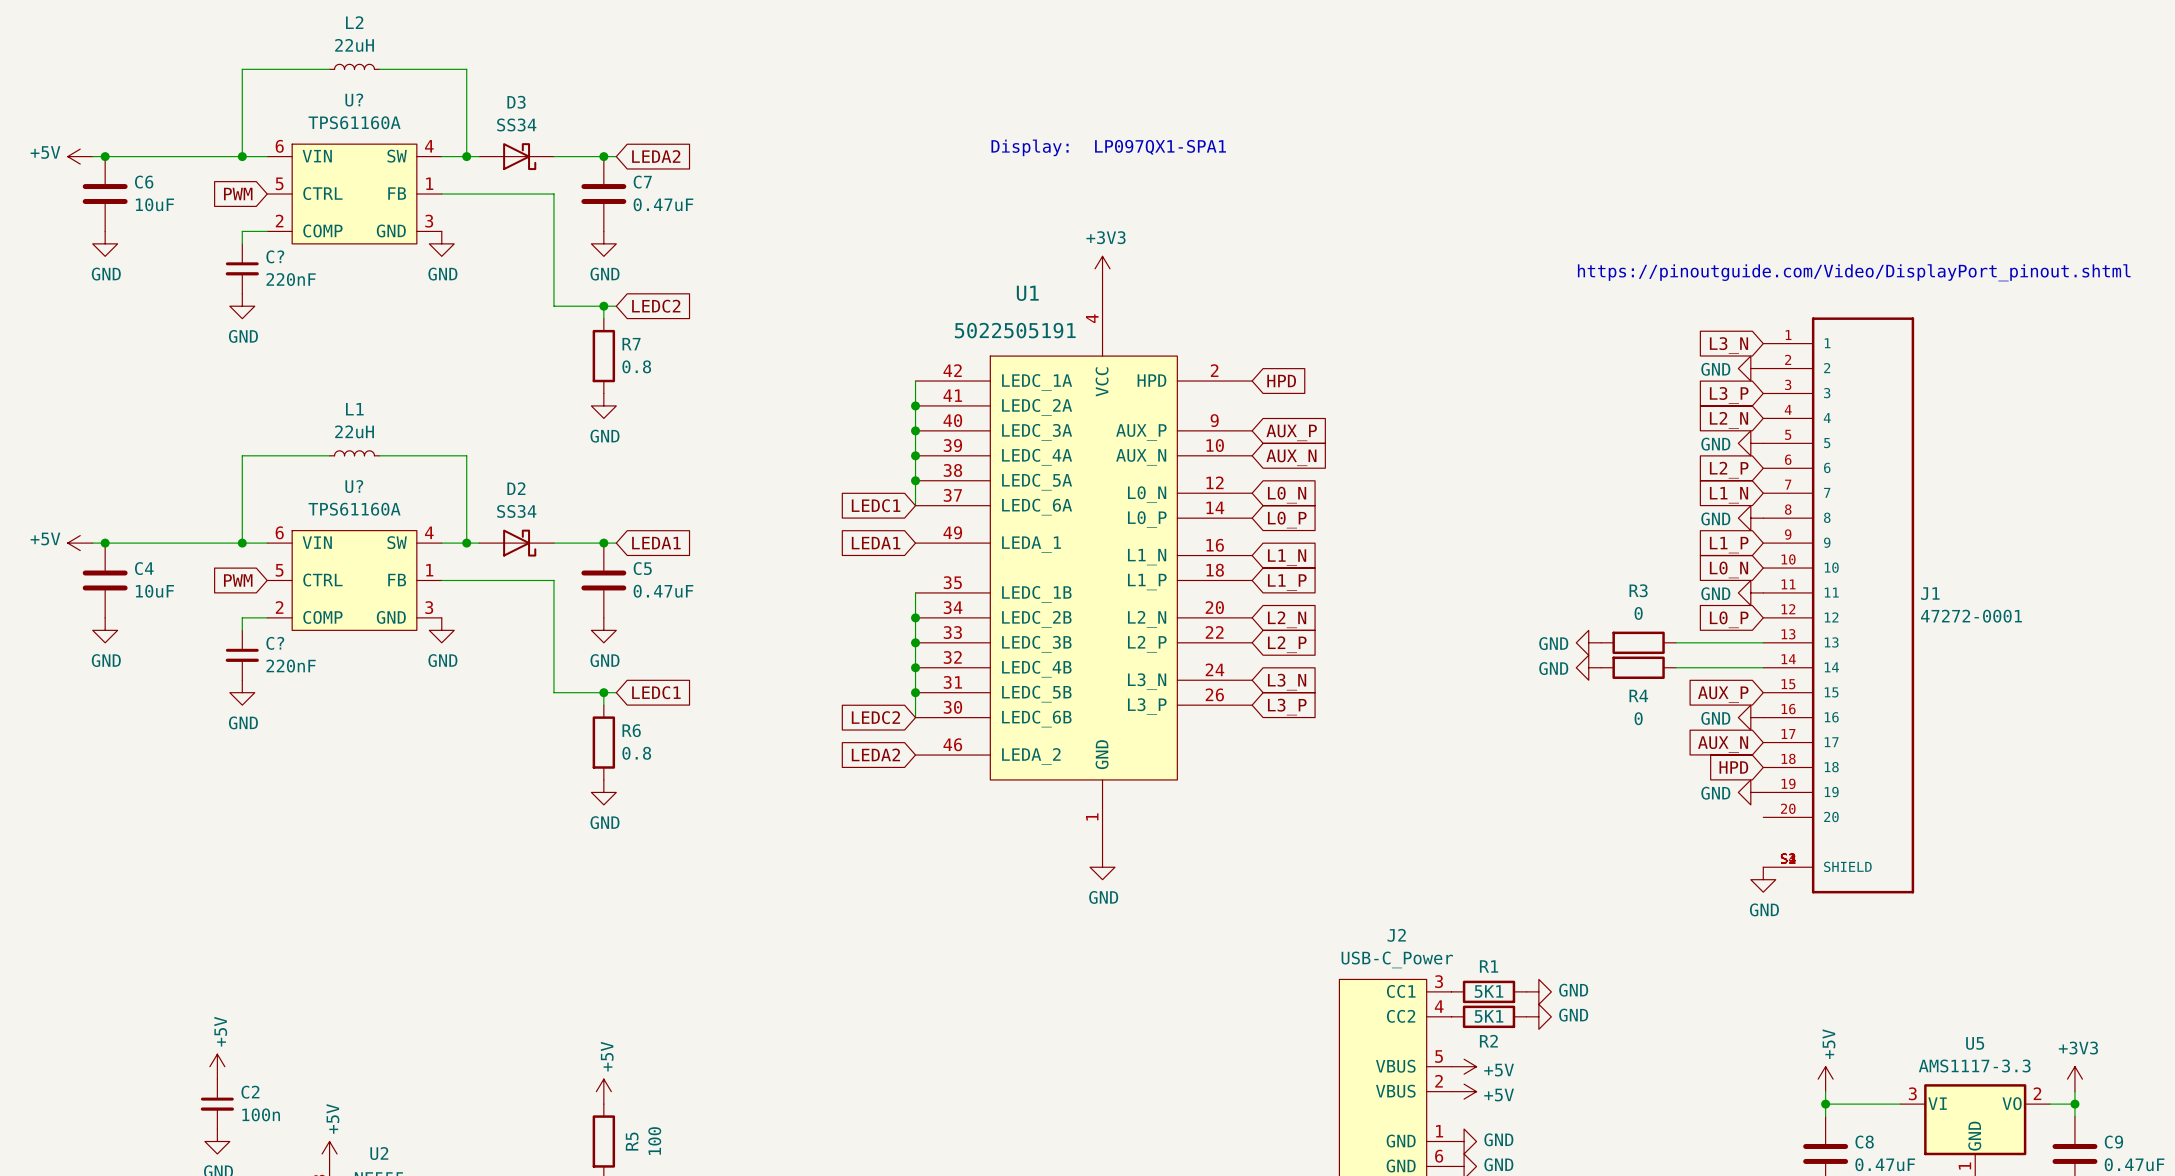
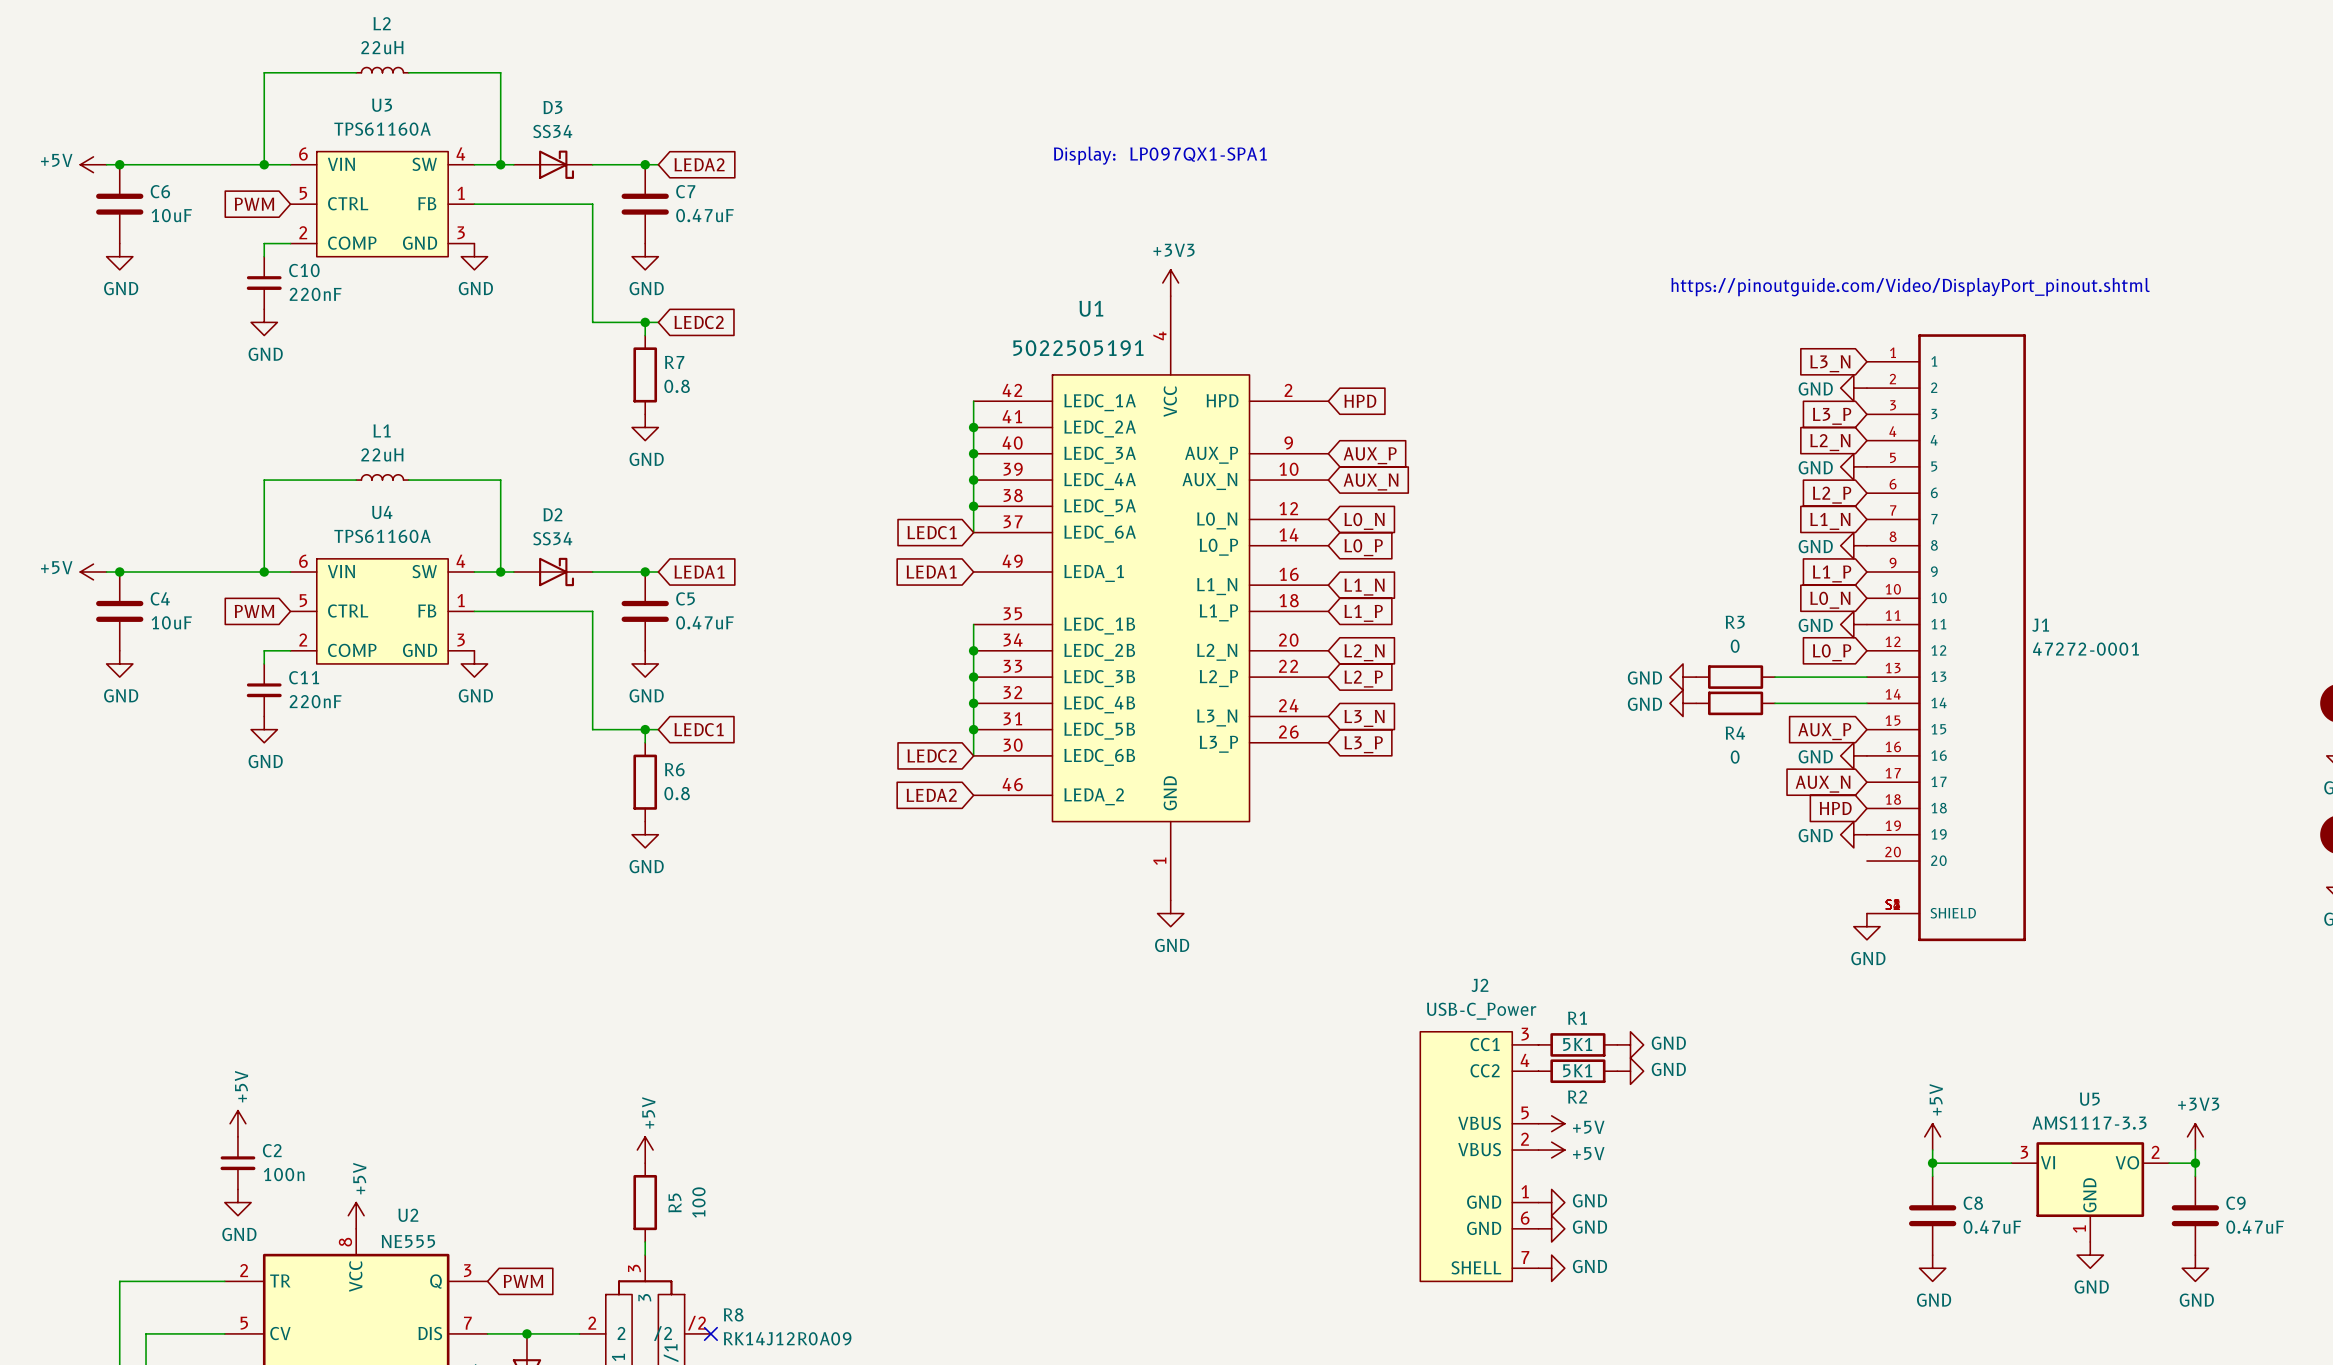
U? name: U? (354, 100) -> U3 (382, 105)
C? name: C? (275, 256) -> C10 (304, 270)
U? name: U? (354, 486) -> U4 (382, 512)
C? name: C? (275, 643) -> C11 (304, 677)

